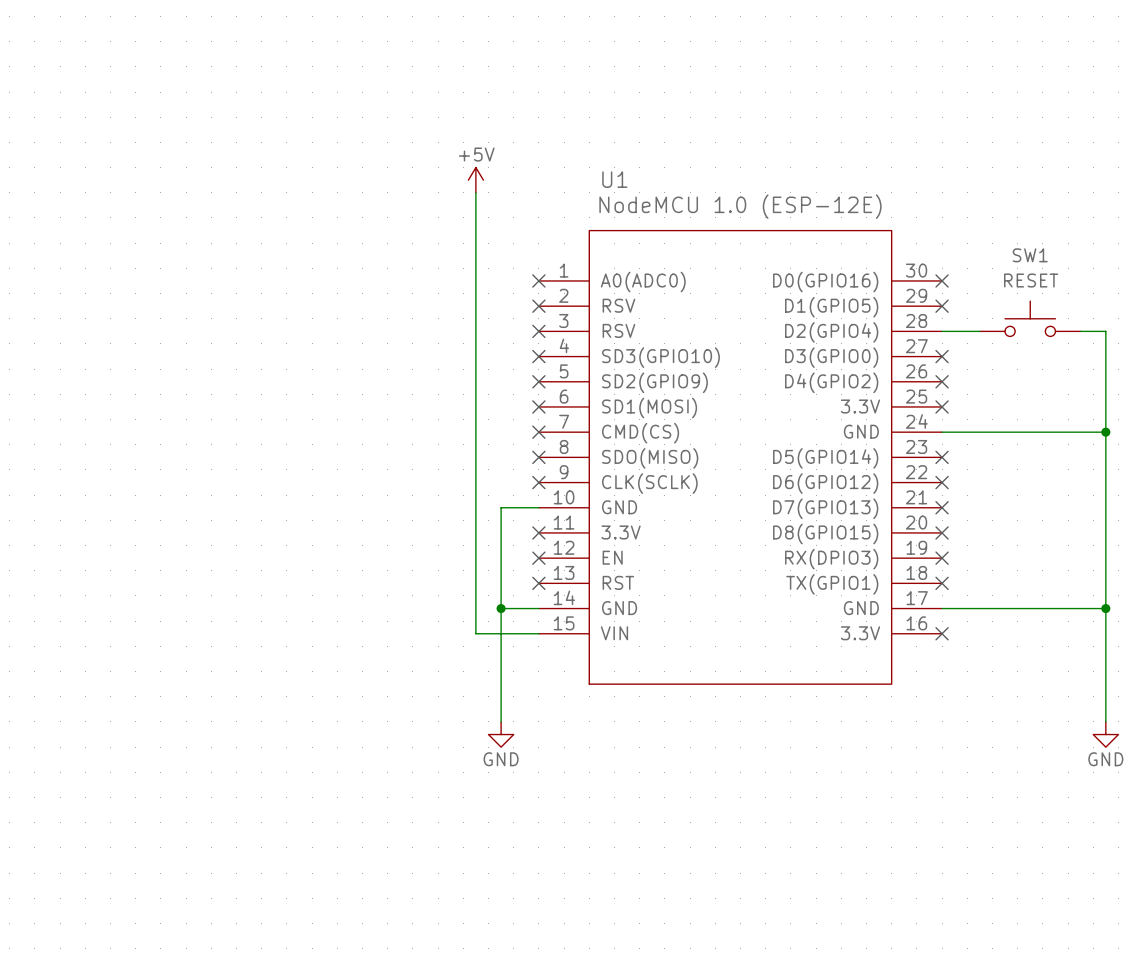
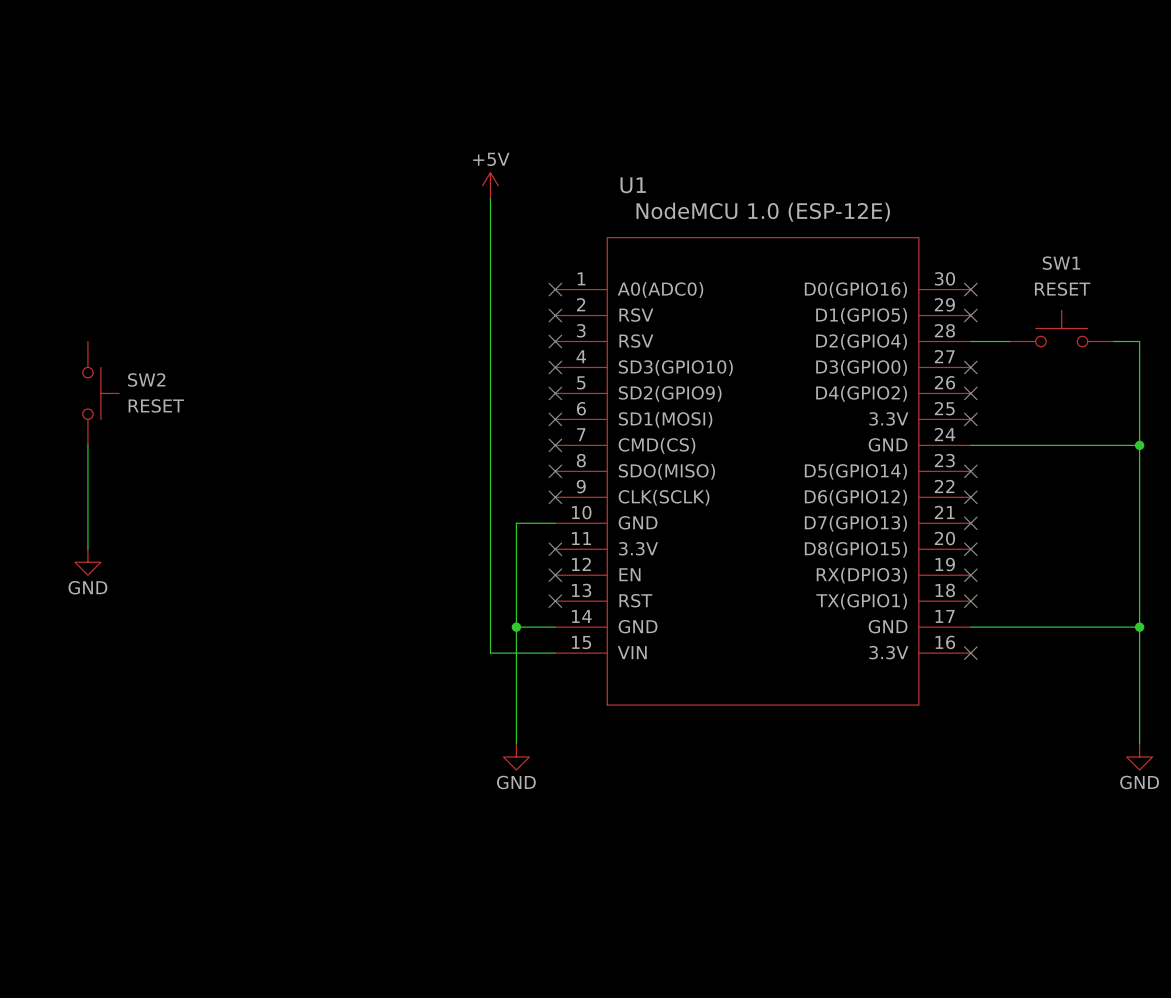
SW2: none -> RESET (100, 393)
wire: none -> (87, 445) (87, 549)
power symbol: none -> GND (87, 562)

